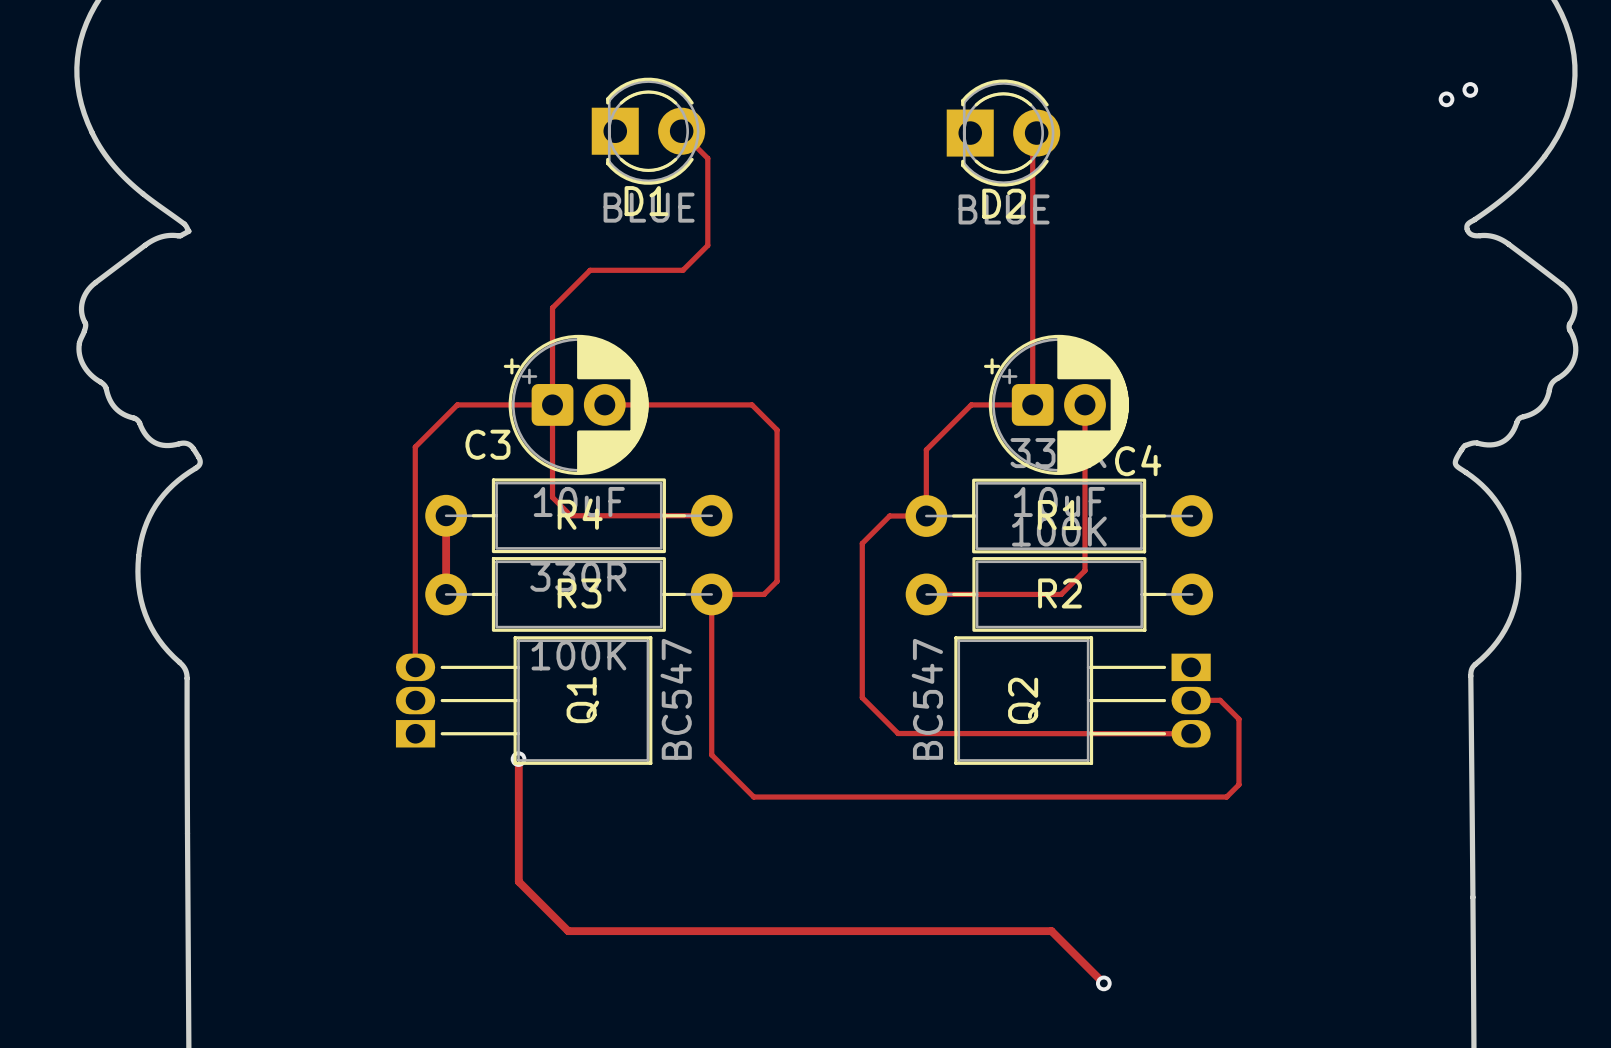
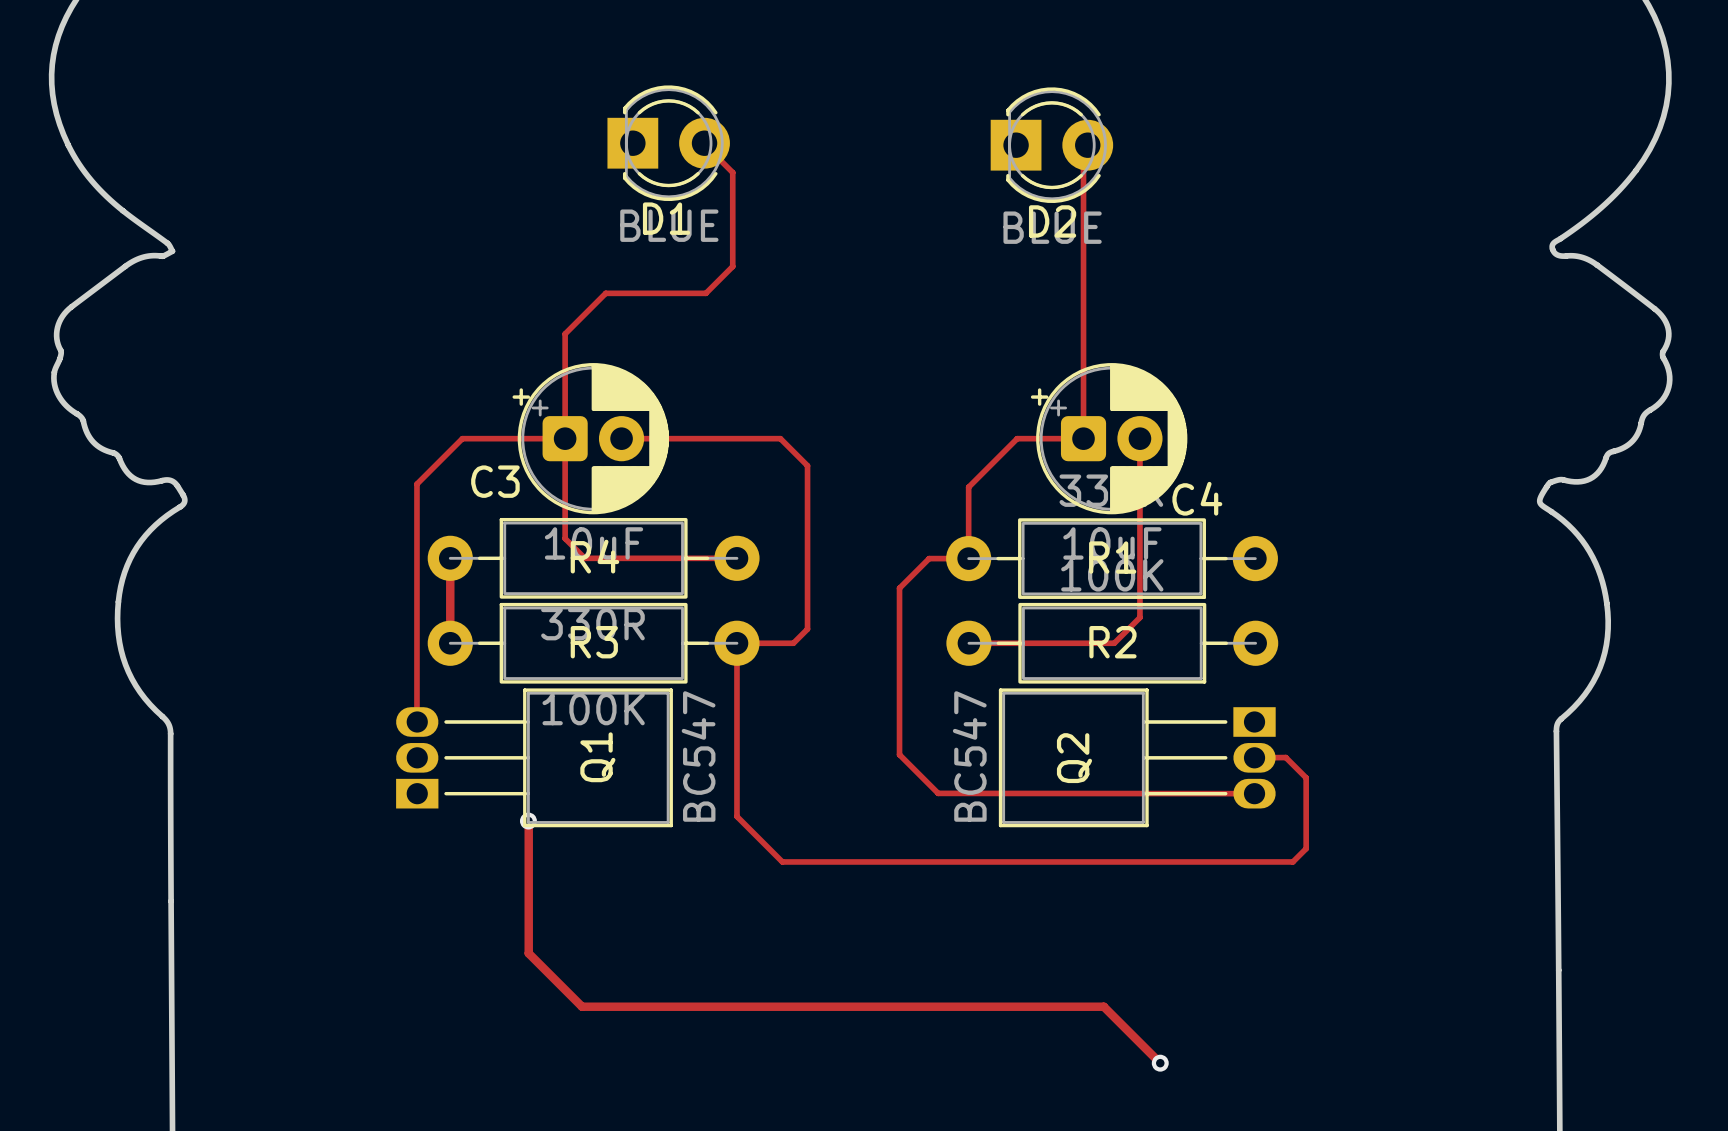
via: (1470, 89) -> none
via: (1446, 99) -> none

